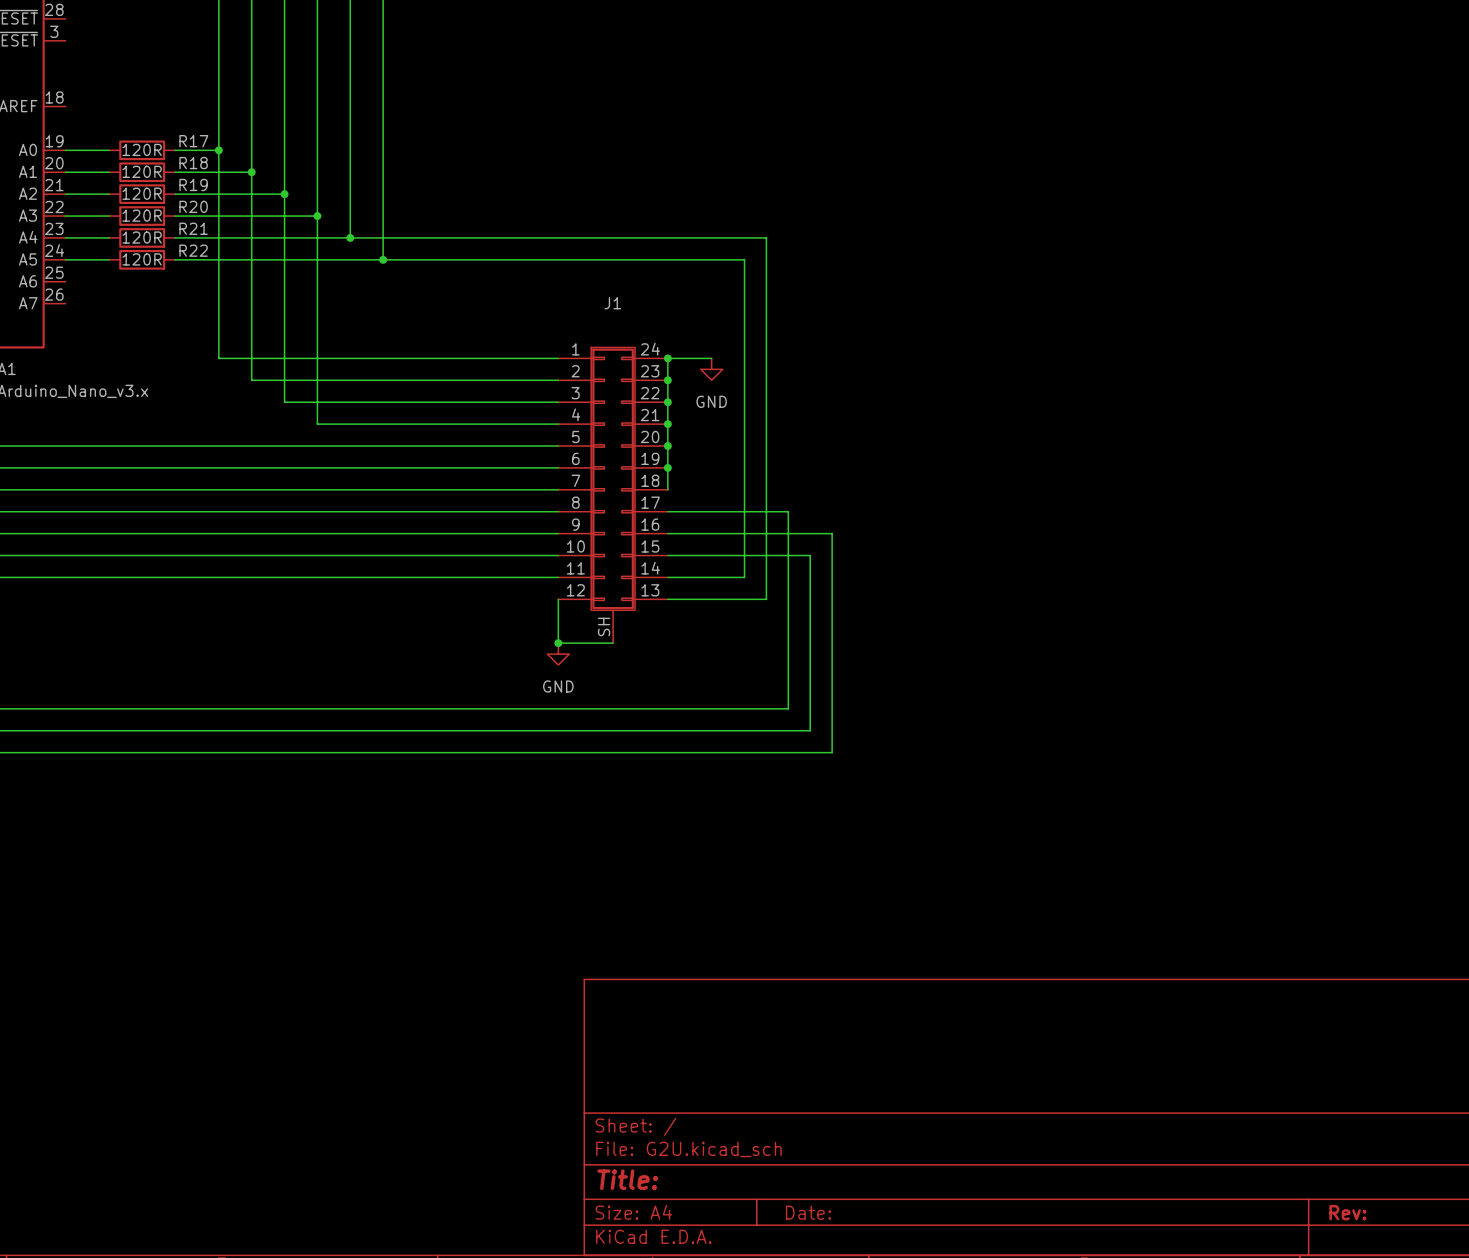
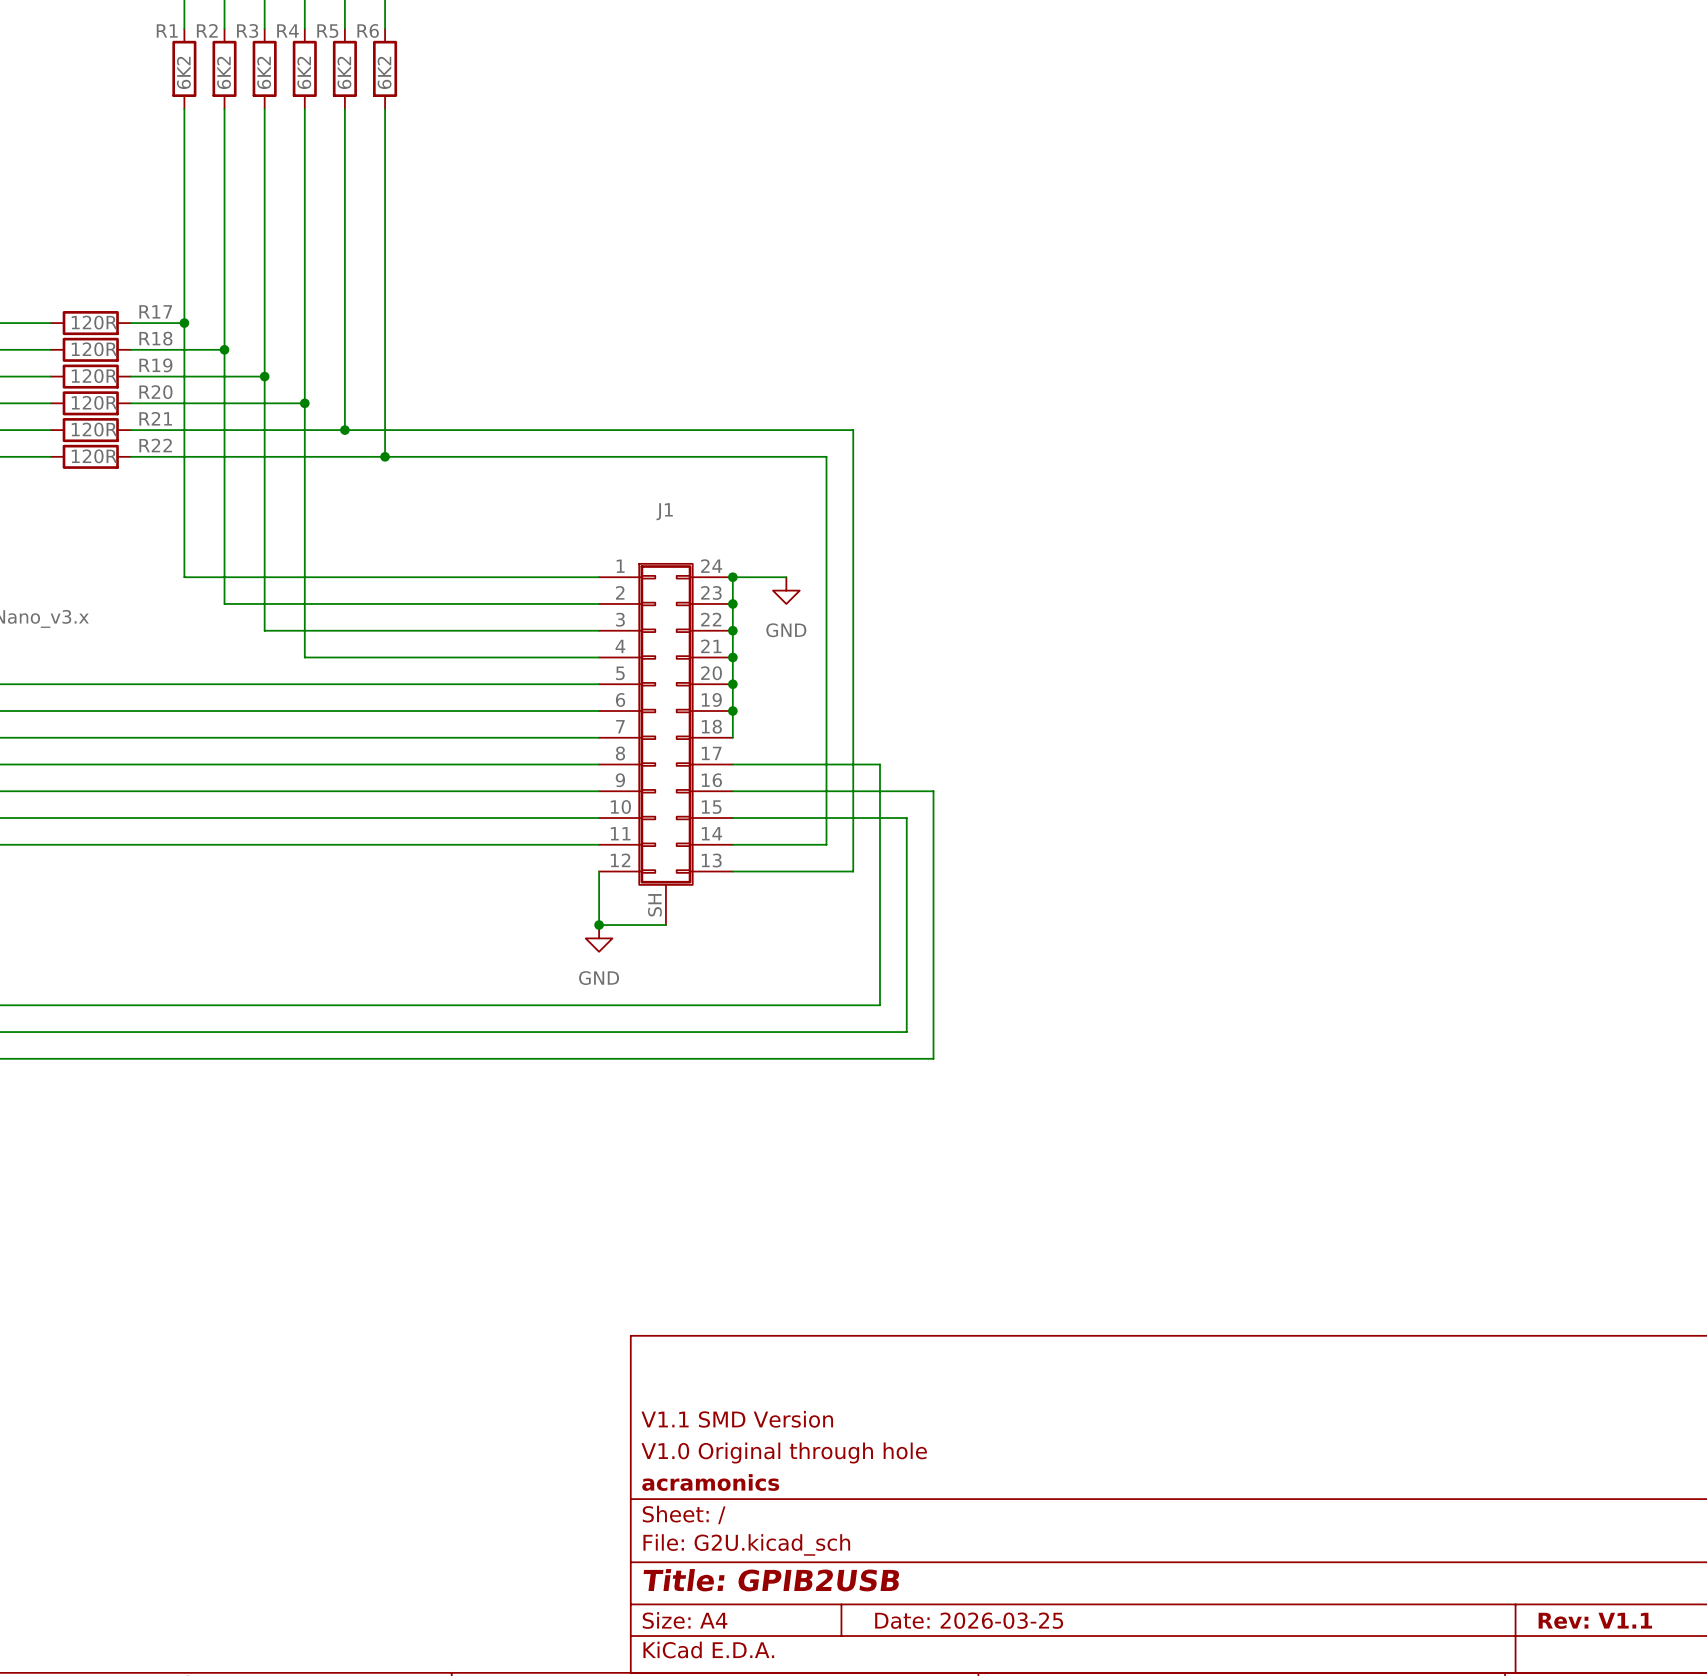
title block: none -> V1.1 SMD Version (737, 1419)
title block: none -> V1.0 Original through hole (784, 1453)
title block: none -> acramonics (710, 1482)
title block: Title: (627, 1179) -> Title: GPIB2USB (771, 1580)
title block: Date: (808, 1212) -> Date: 2026-03-25 (969, 1620)
title block: Rev: (1347, 1212) -> Rev: V1.1 (1595, 1620)

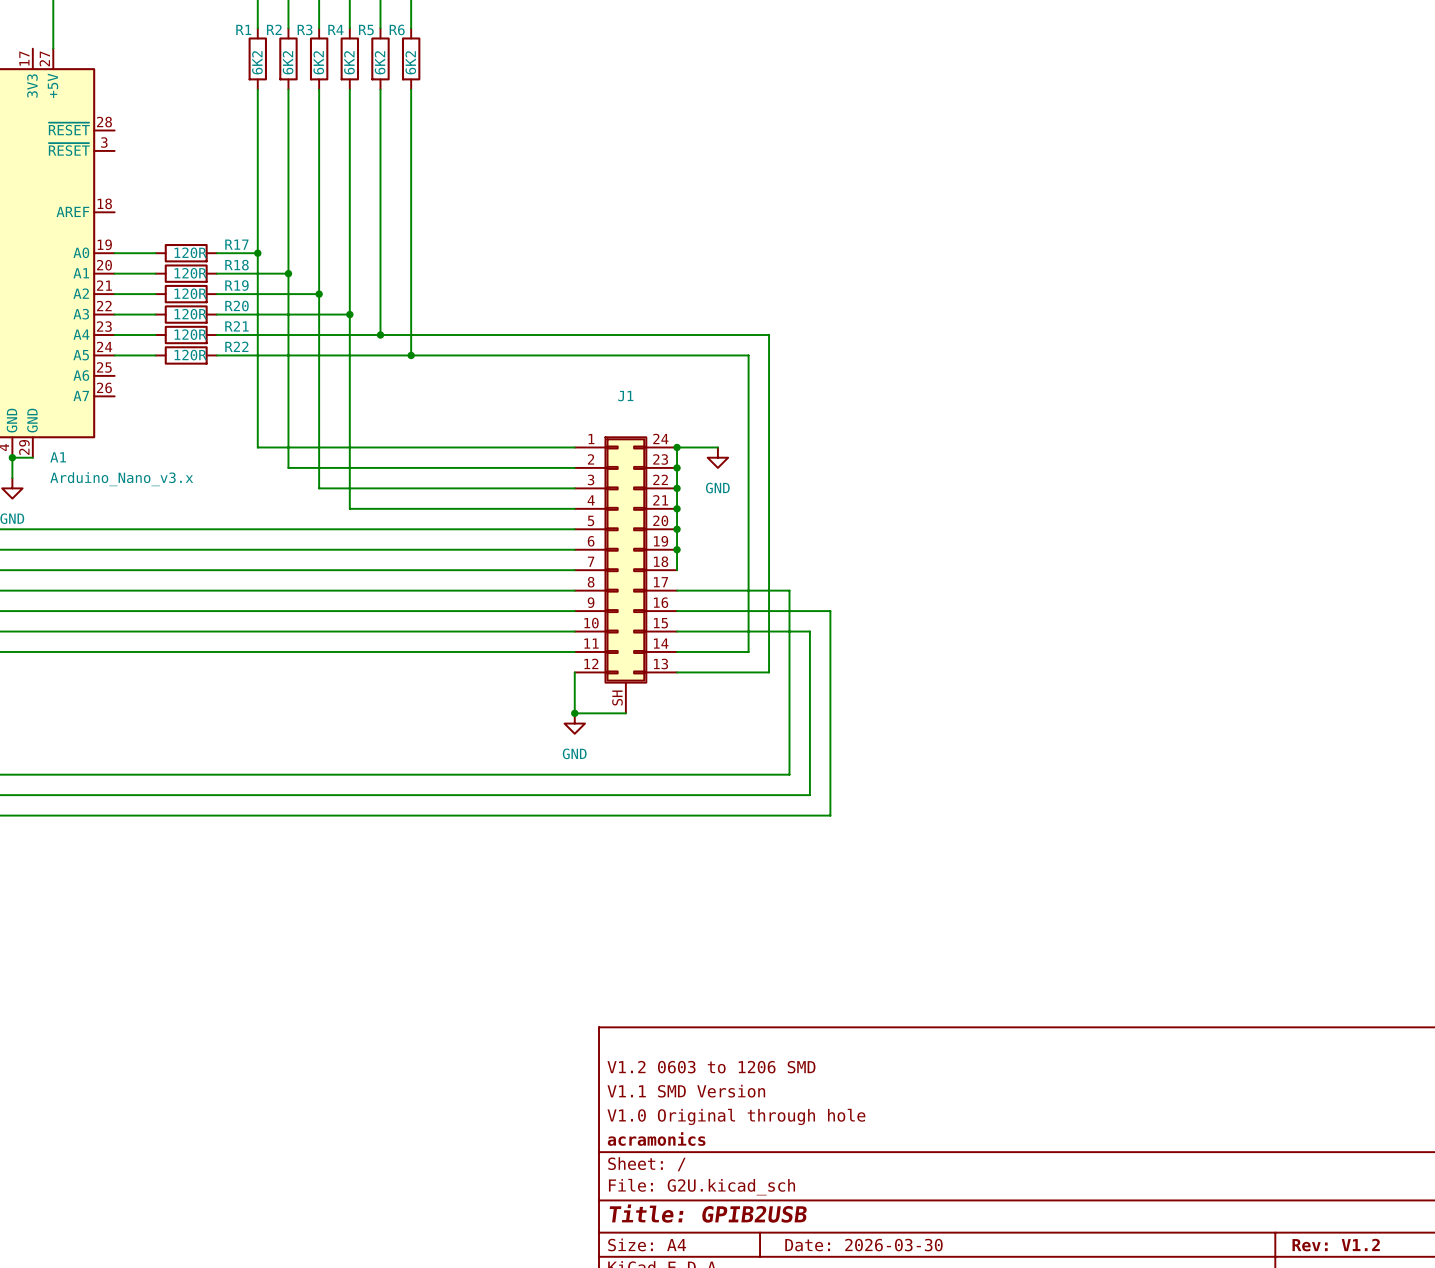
title block: none -> V1.2 0603 to 1206 SMD (711, 1067)
title block: Date: 2026-03-25 (969, 1620) -> Date: 2026-03-30 (863, 1245)
title block: Rev: V1.1 (1595, 1620) -> Rev: V1.2 (1336, 1245)

